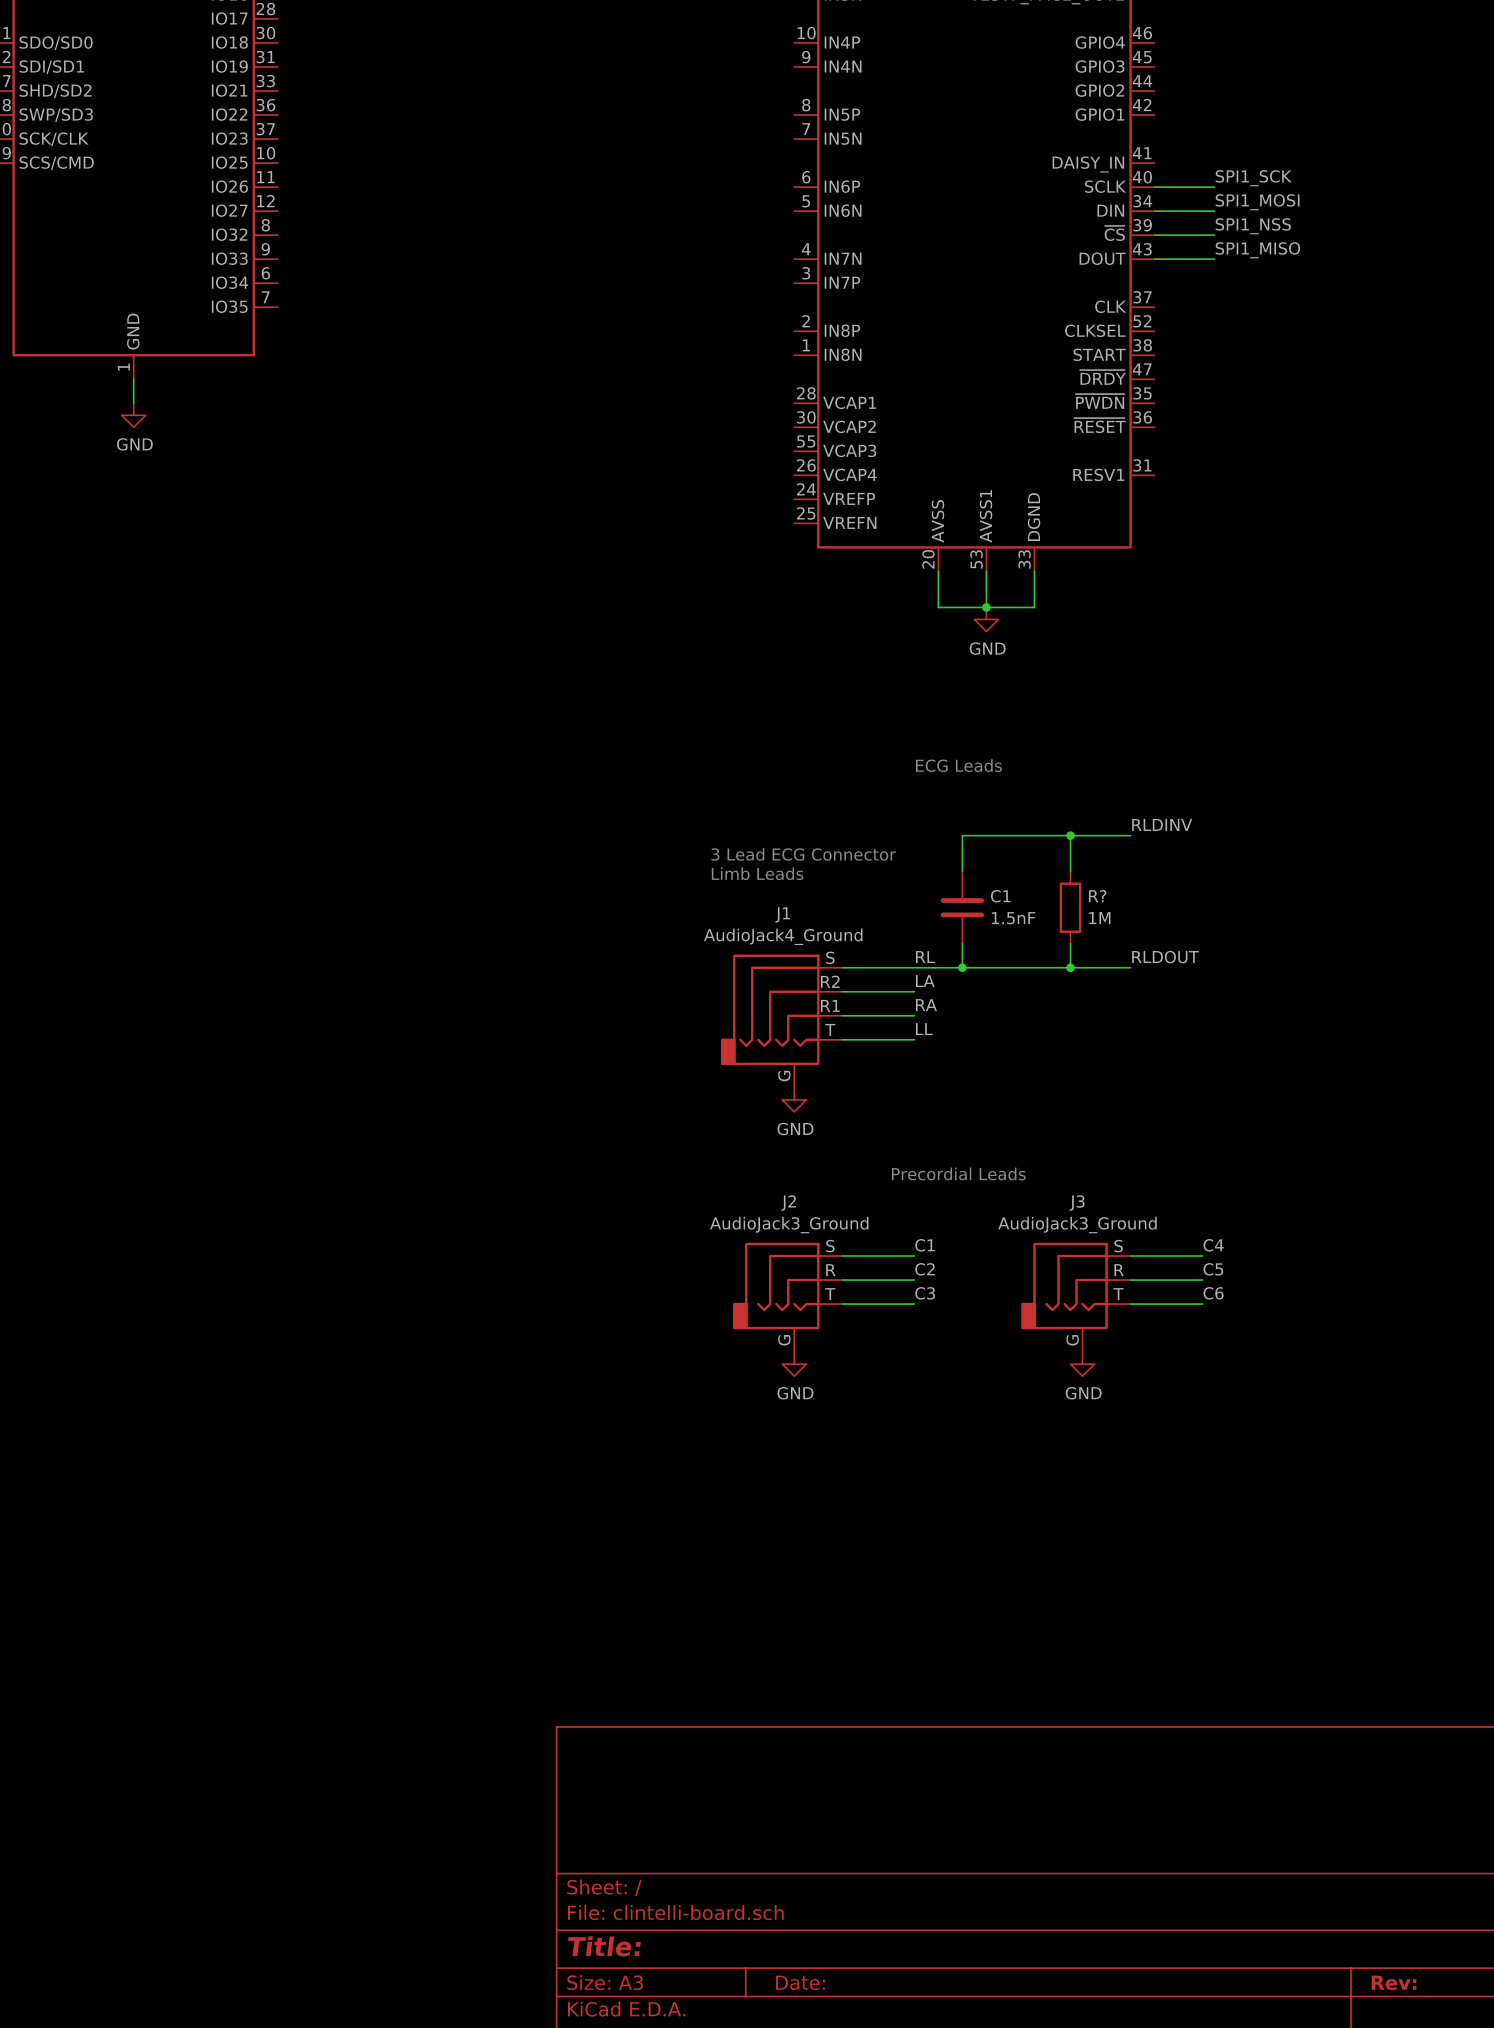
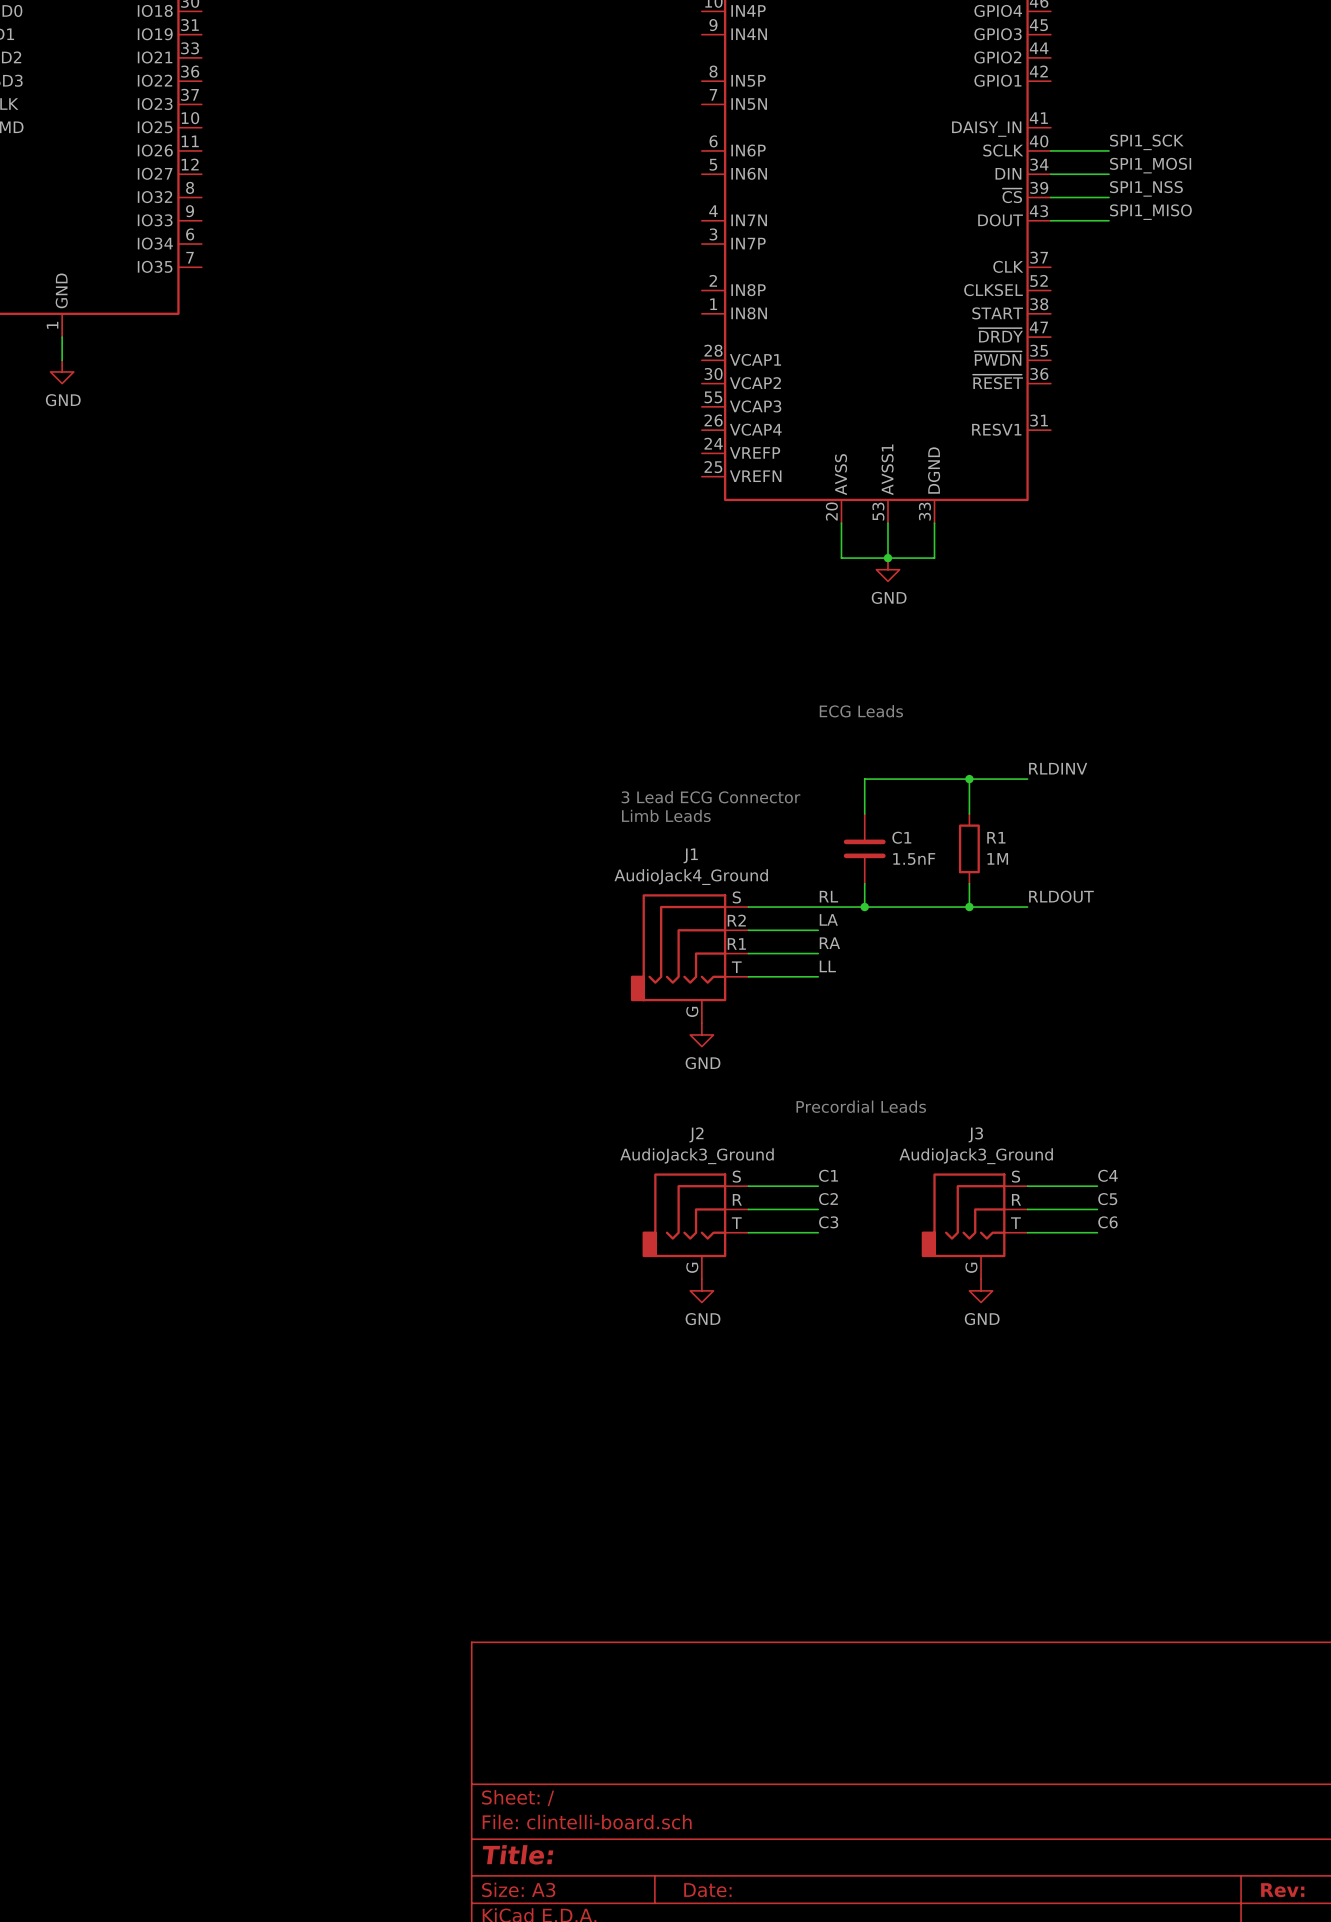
R? name: R? (1097, 896) -> R1 (996, 837)

